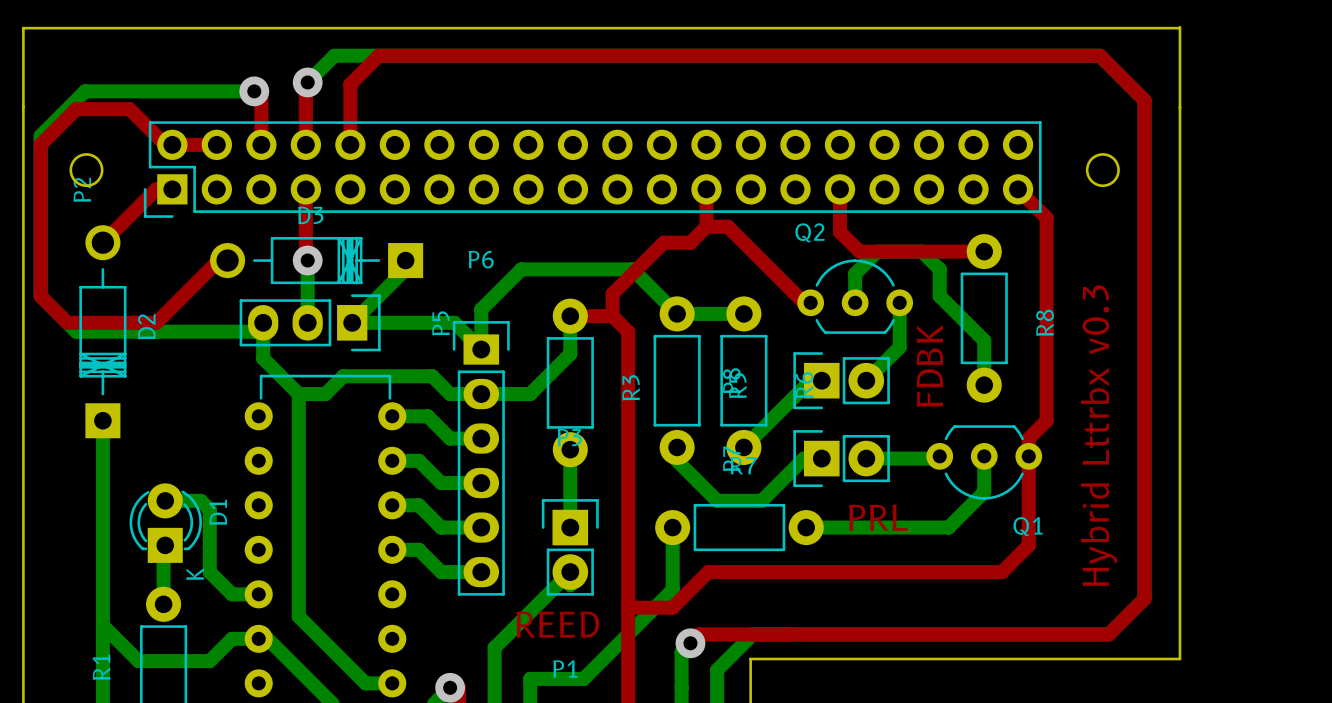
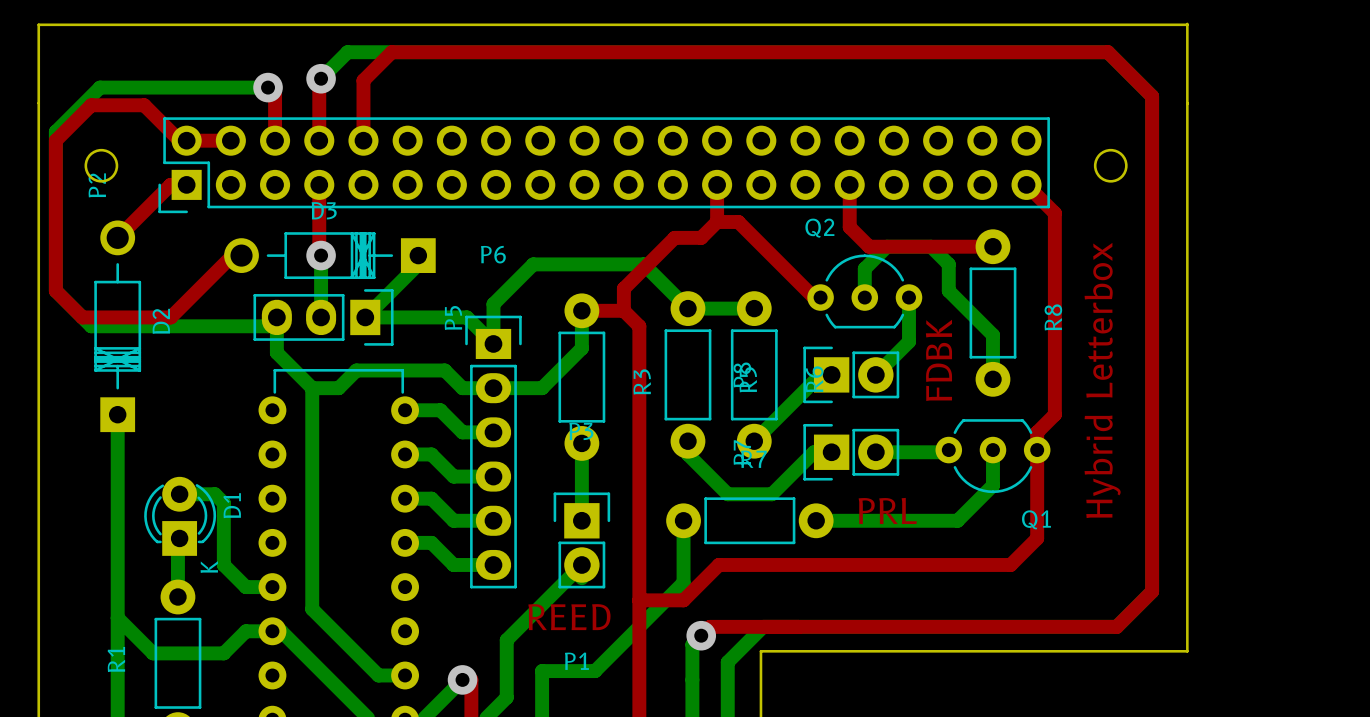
text: Hybrid Lttrbx v0.3 (1099, 435) -> Hybrid Letterbox (1102, 380)

